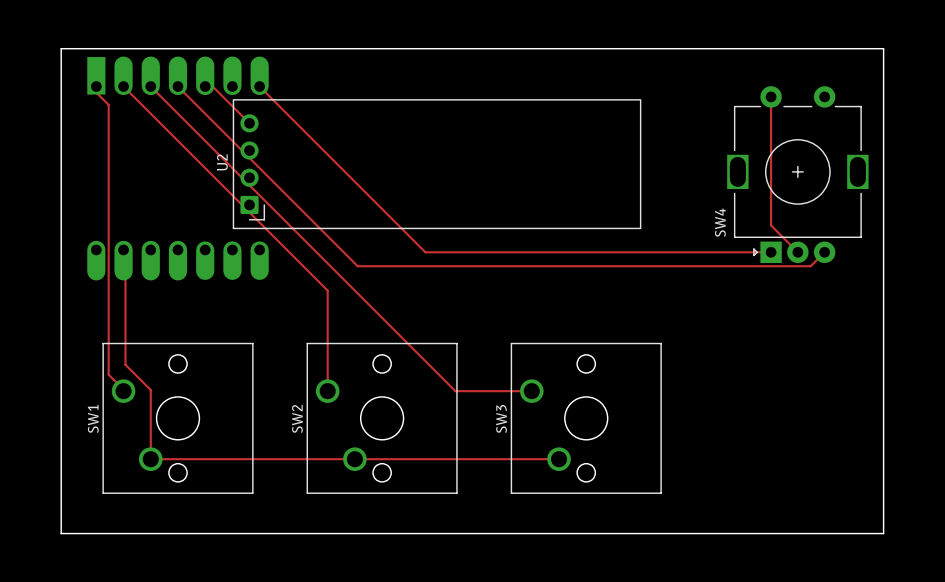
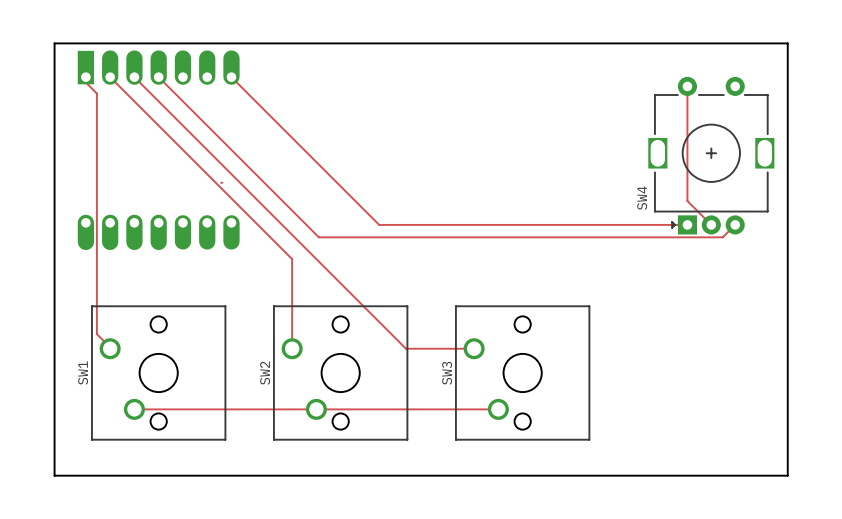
track: (205, 86) (212, 86) (249, 123) -> none
U2: (437, 164) -> none
track: (123, 249) (125, 249) (125, 364) (150, 390) (150, 459) -> none

